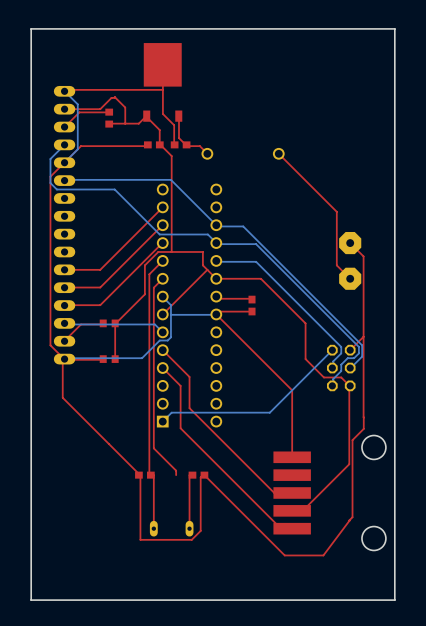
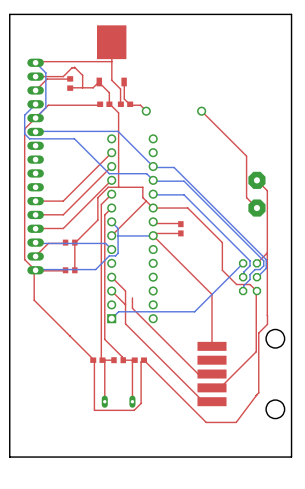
top track: (162, 350) (189, 376) (189, 394) -> none
top track: none -> (111, 291) (125, 304)
top track: none -> (113, 360) (104, 360)
part: none -> (118, 360)
top track: none -> (132, 360) (122, 360)

